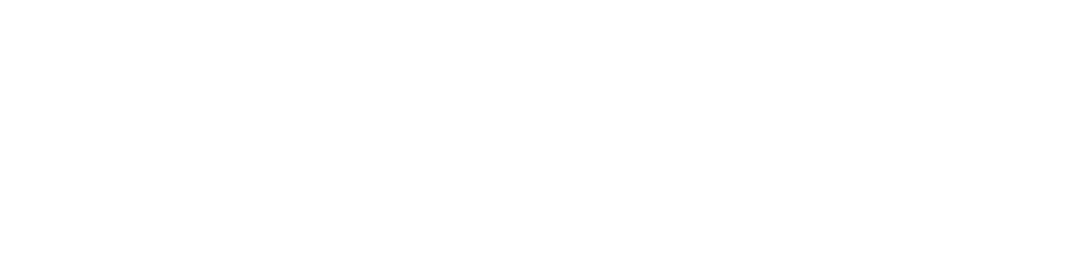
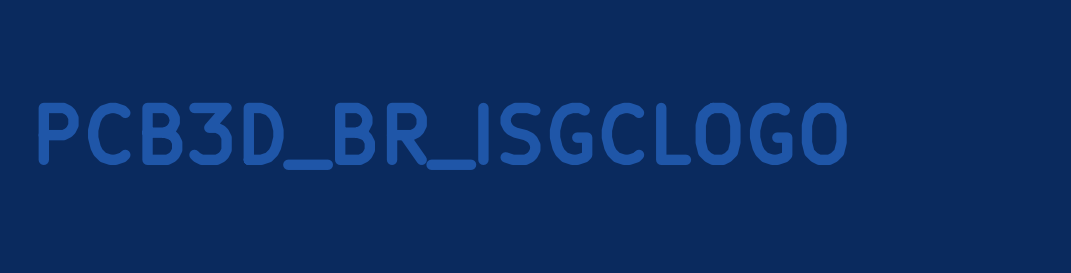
text: none -> PCB3D_BR_ISGCLOGO (442, 136)

